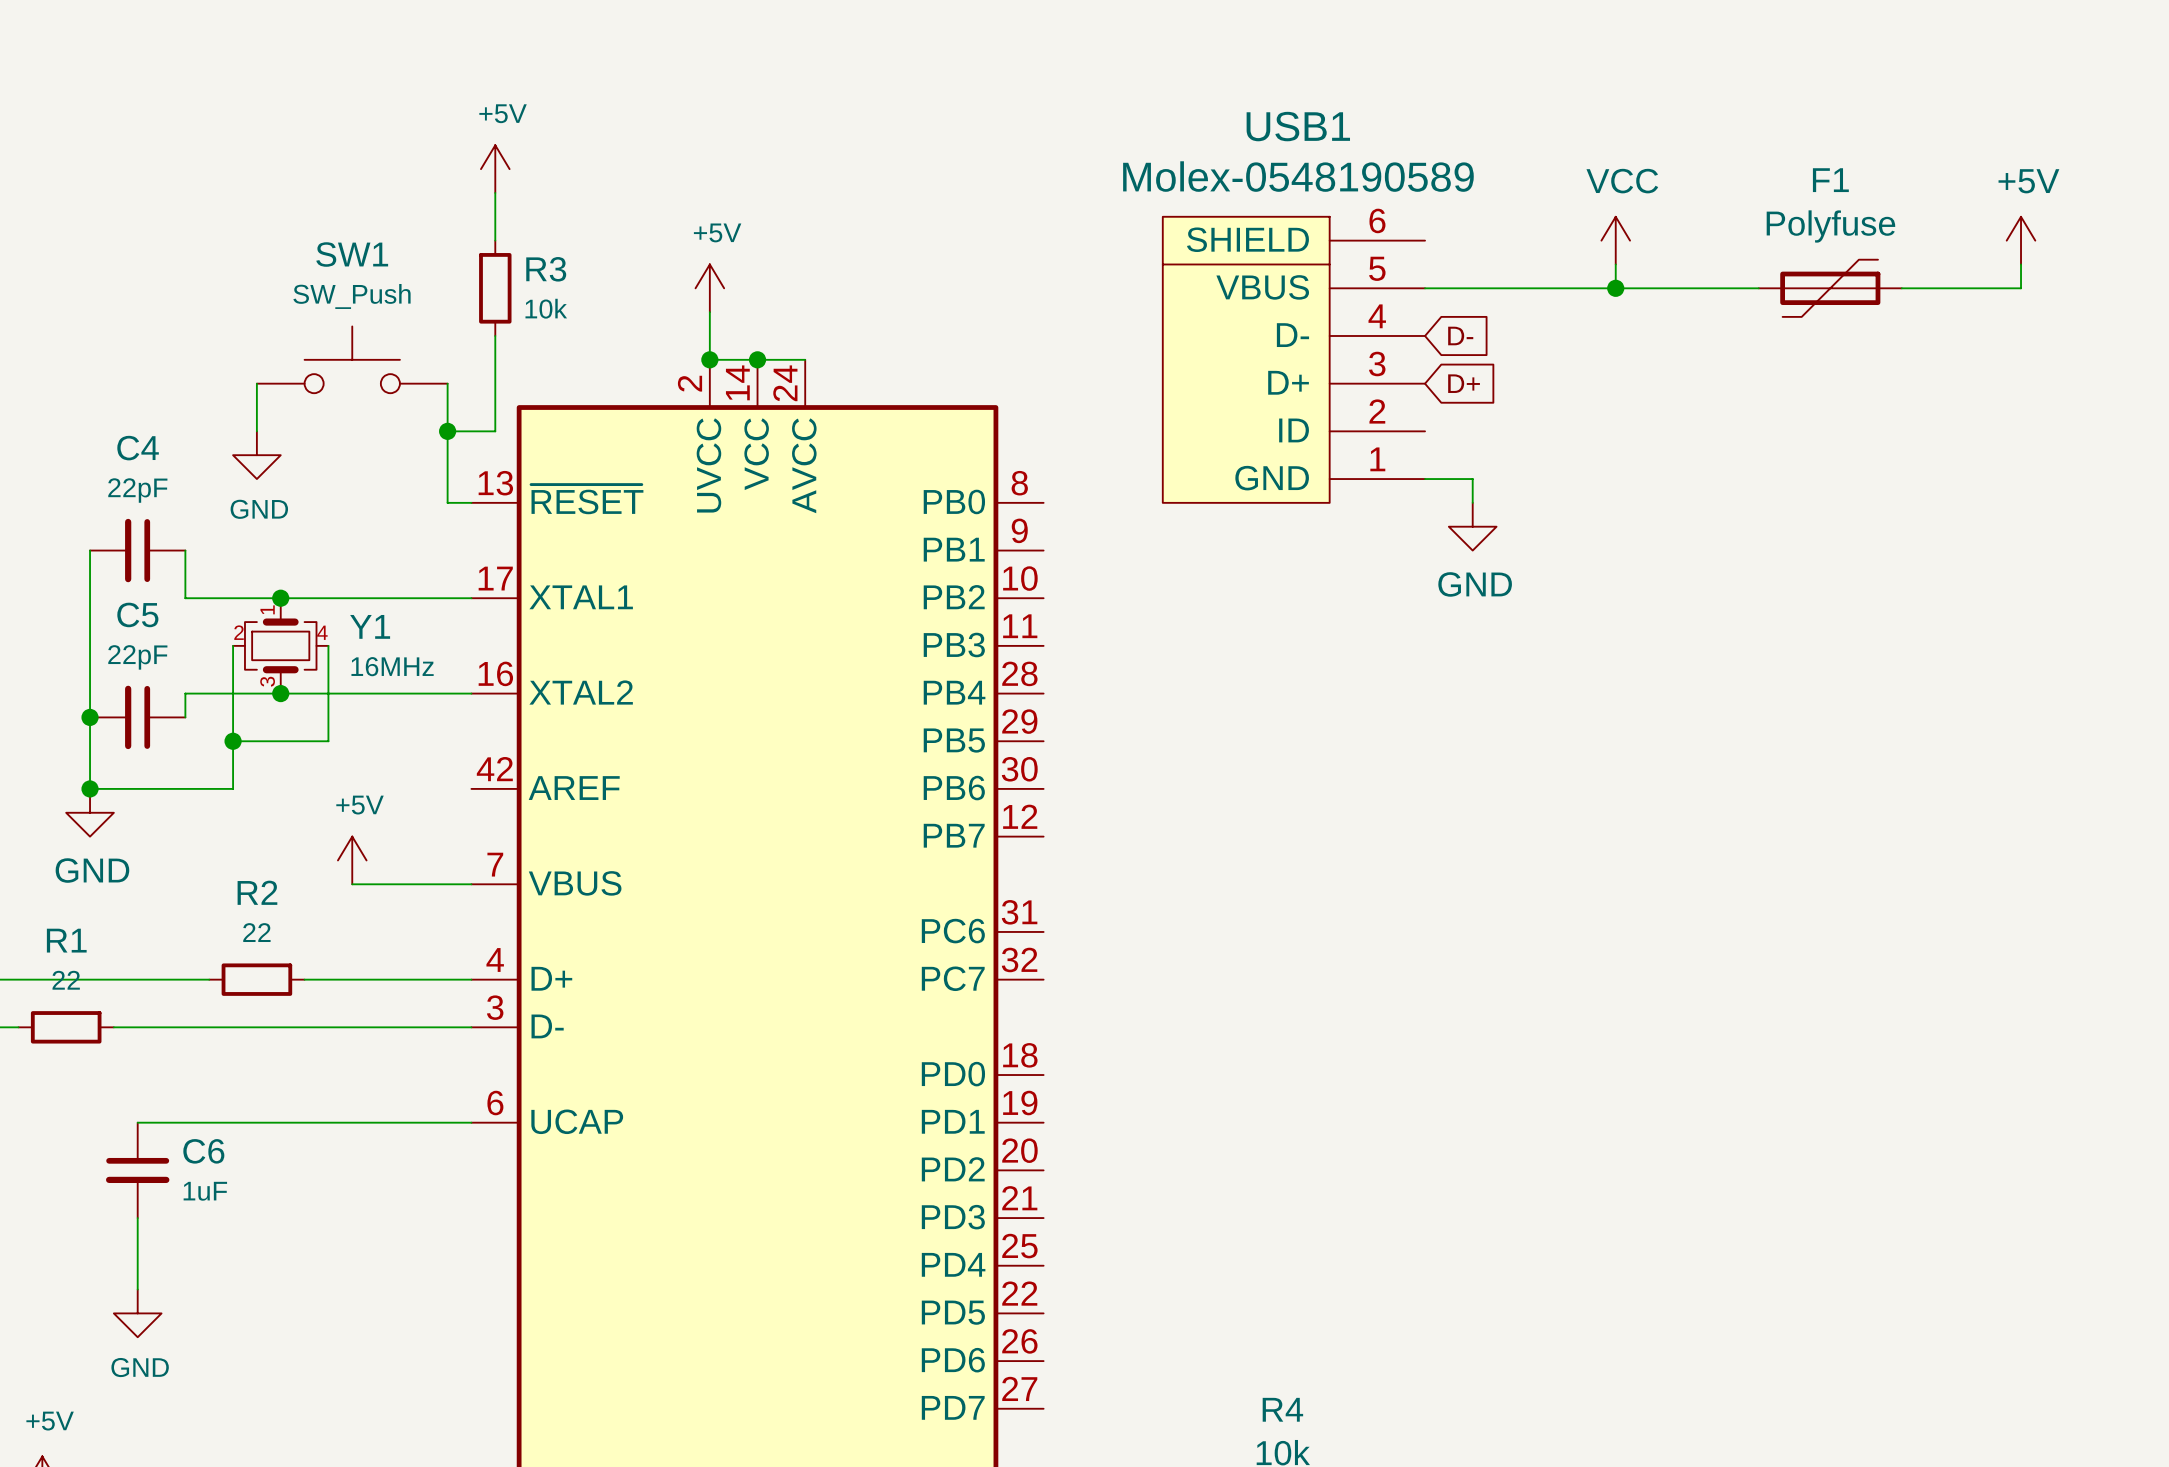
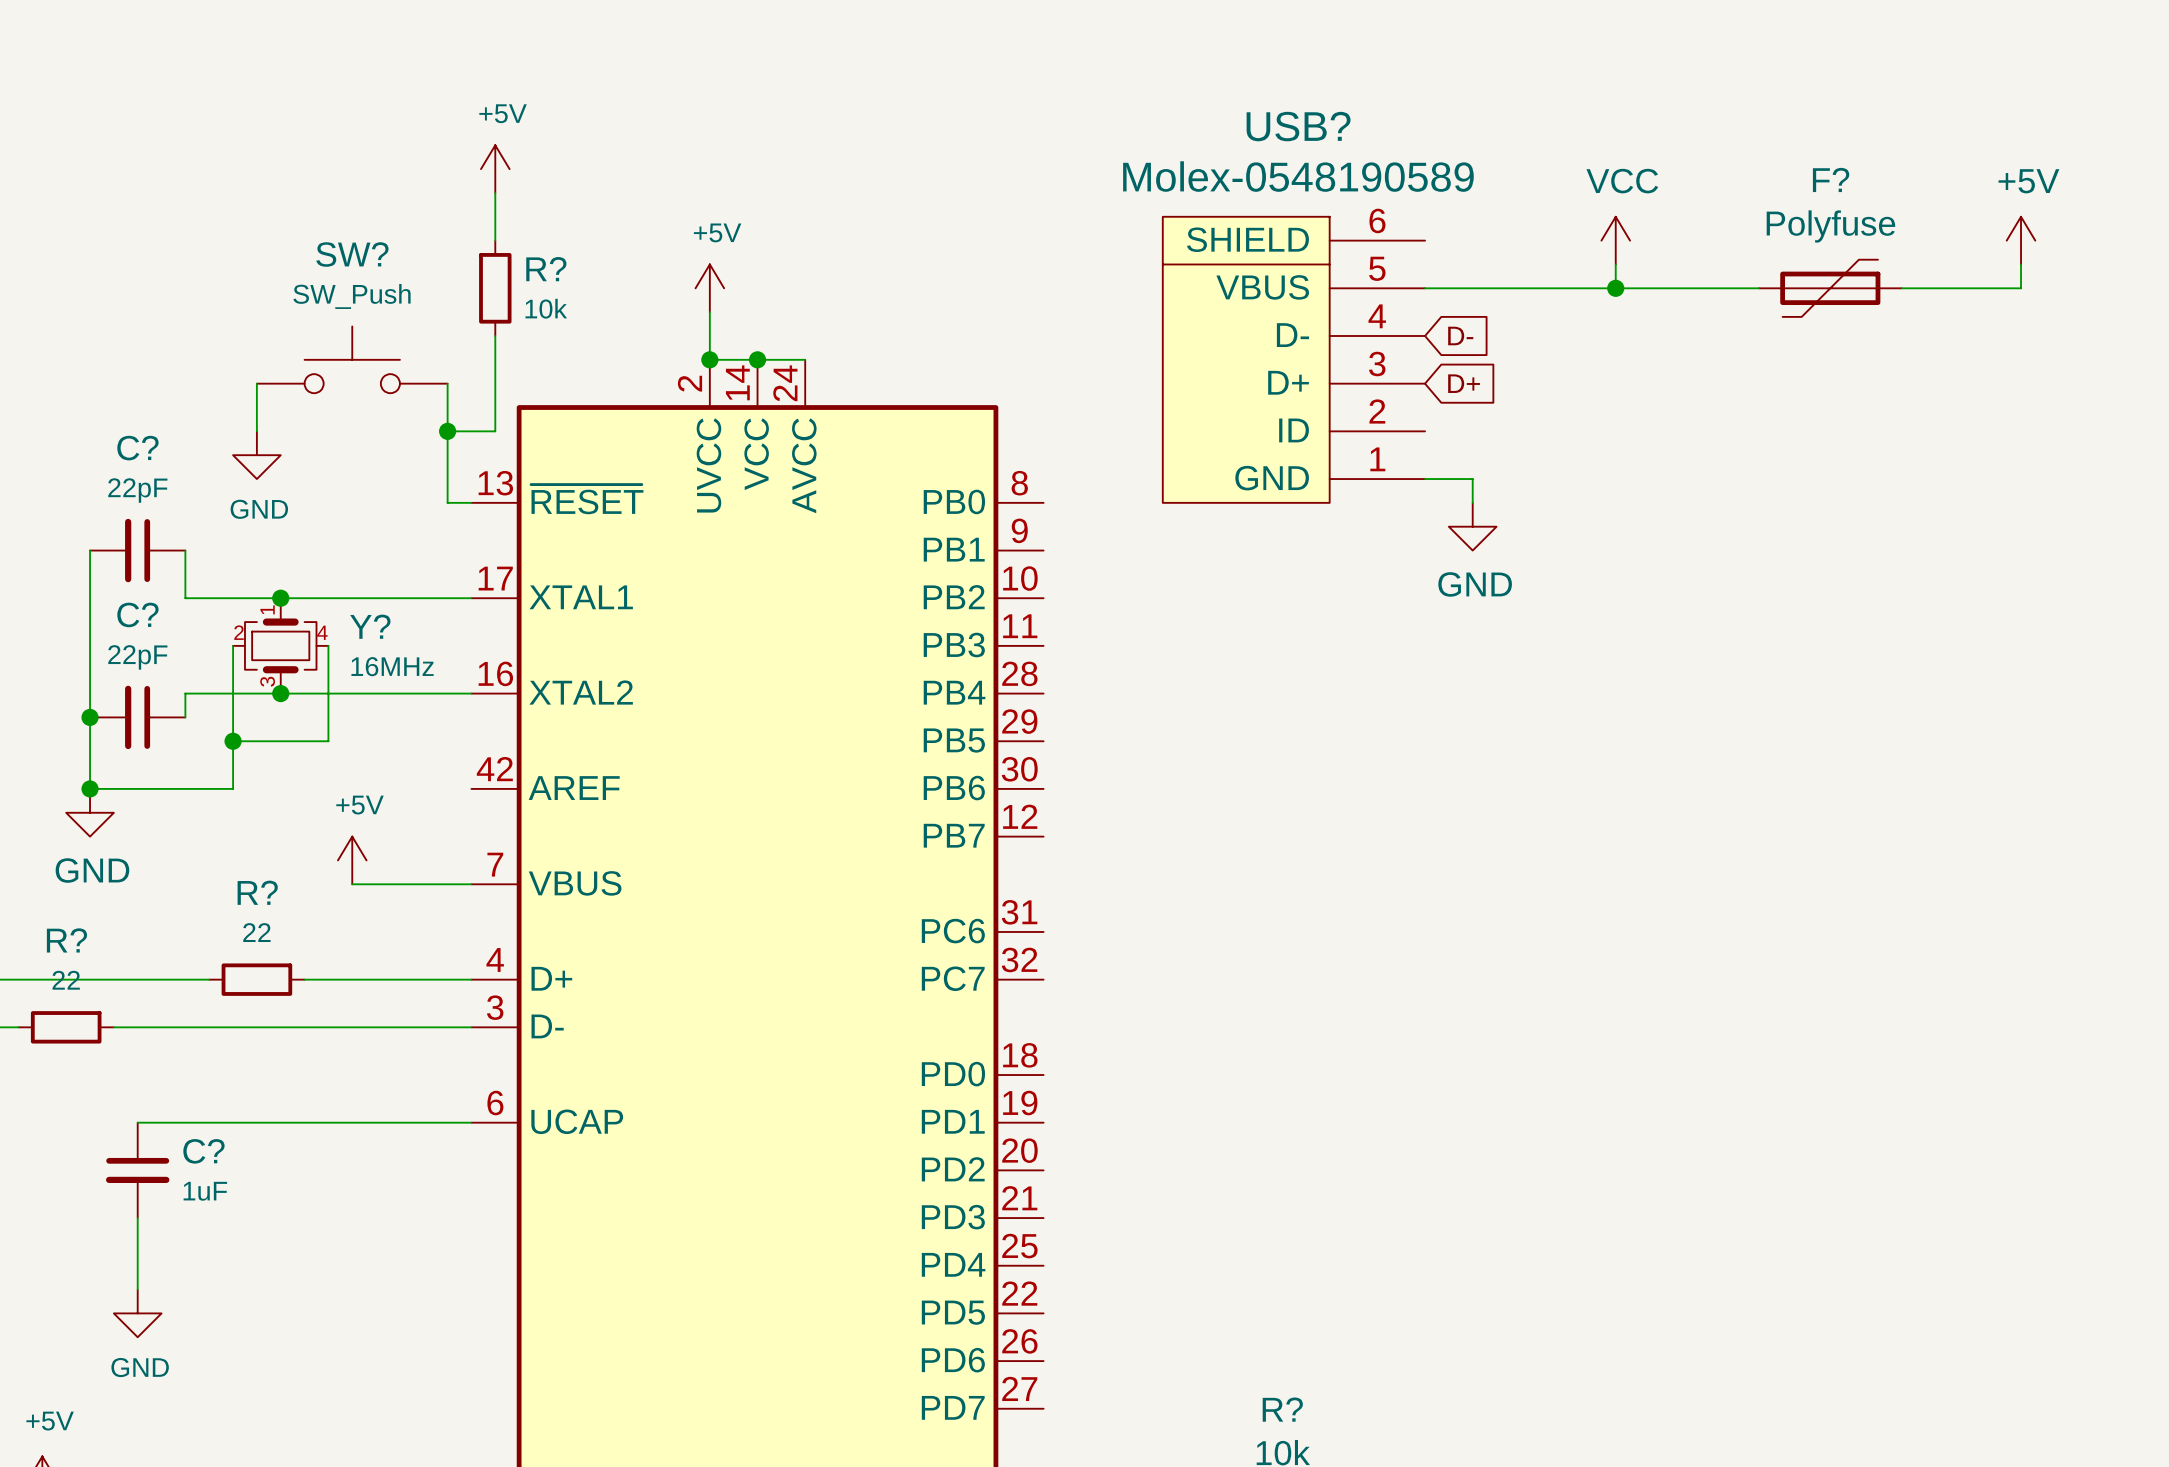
USB1 name: USB1 (1298, 126) -> USB? (1298, 126)
F1 name: F1 (1830, 180) -> F? (1831, 179)
SW1 name: SW1 (352, 254) -> SW? (352, 254)
R3 name: R3 (546, 269) -> R? (546, 269)
C4 name: C4 (138, 448) -> C? (137, 448)
C5 name: C5 (137, 614) -> C? (137, 614)
Y1 name: Y1 (370, 626) -> Y? (370, 626)
R2 name: R2 (257, 892) -> R? (257, 892)
R1 name: R1 (66, 940) -> R? (66, 940)
C6 name: C6 (203, 1151) -> C? (203, 1151)
R4 name: R4 (1282, 1409) -> R? (1282, 1409)

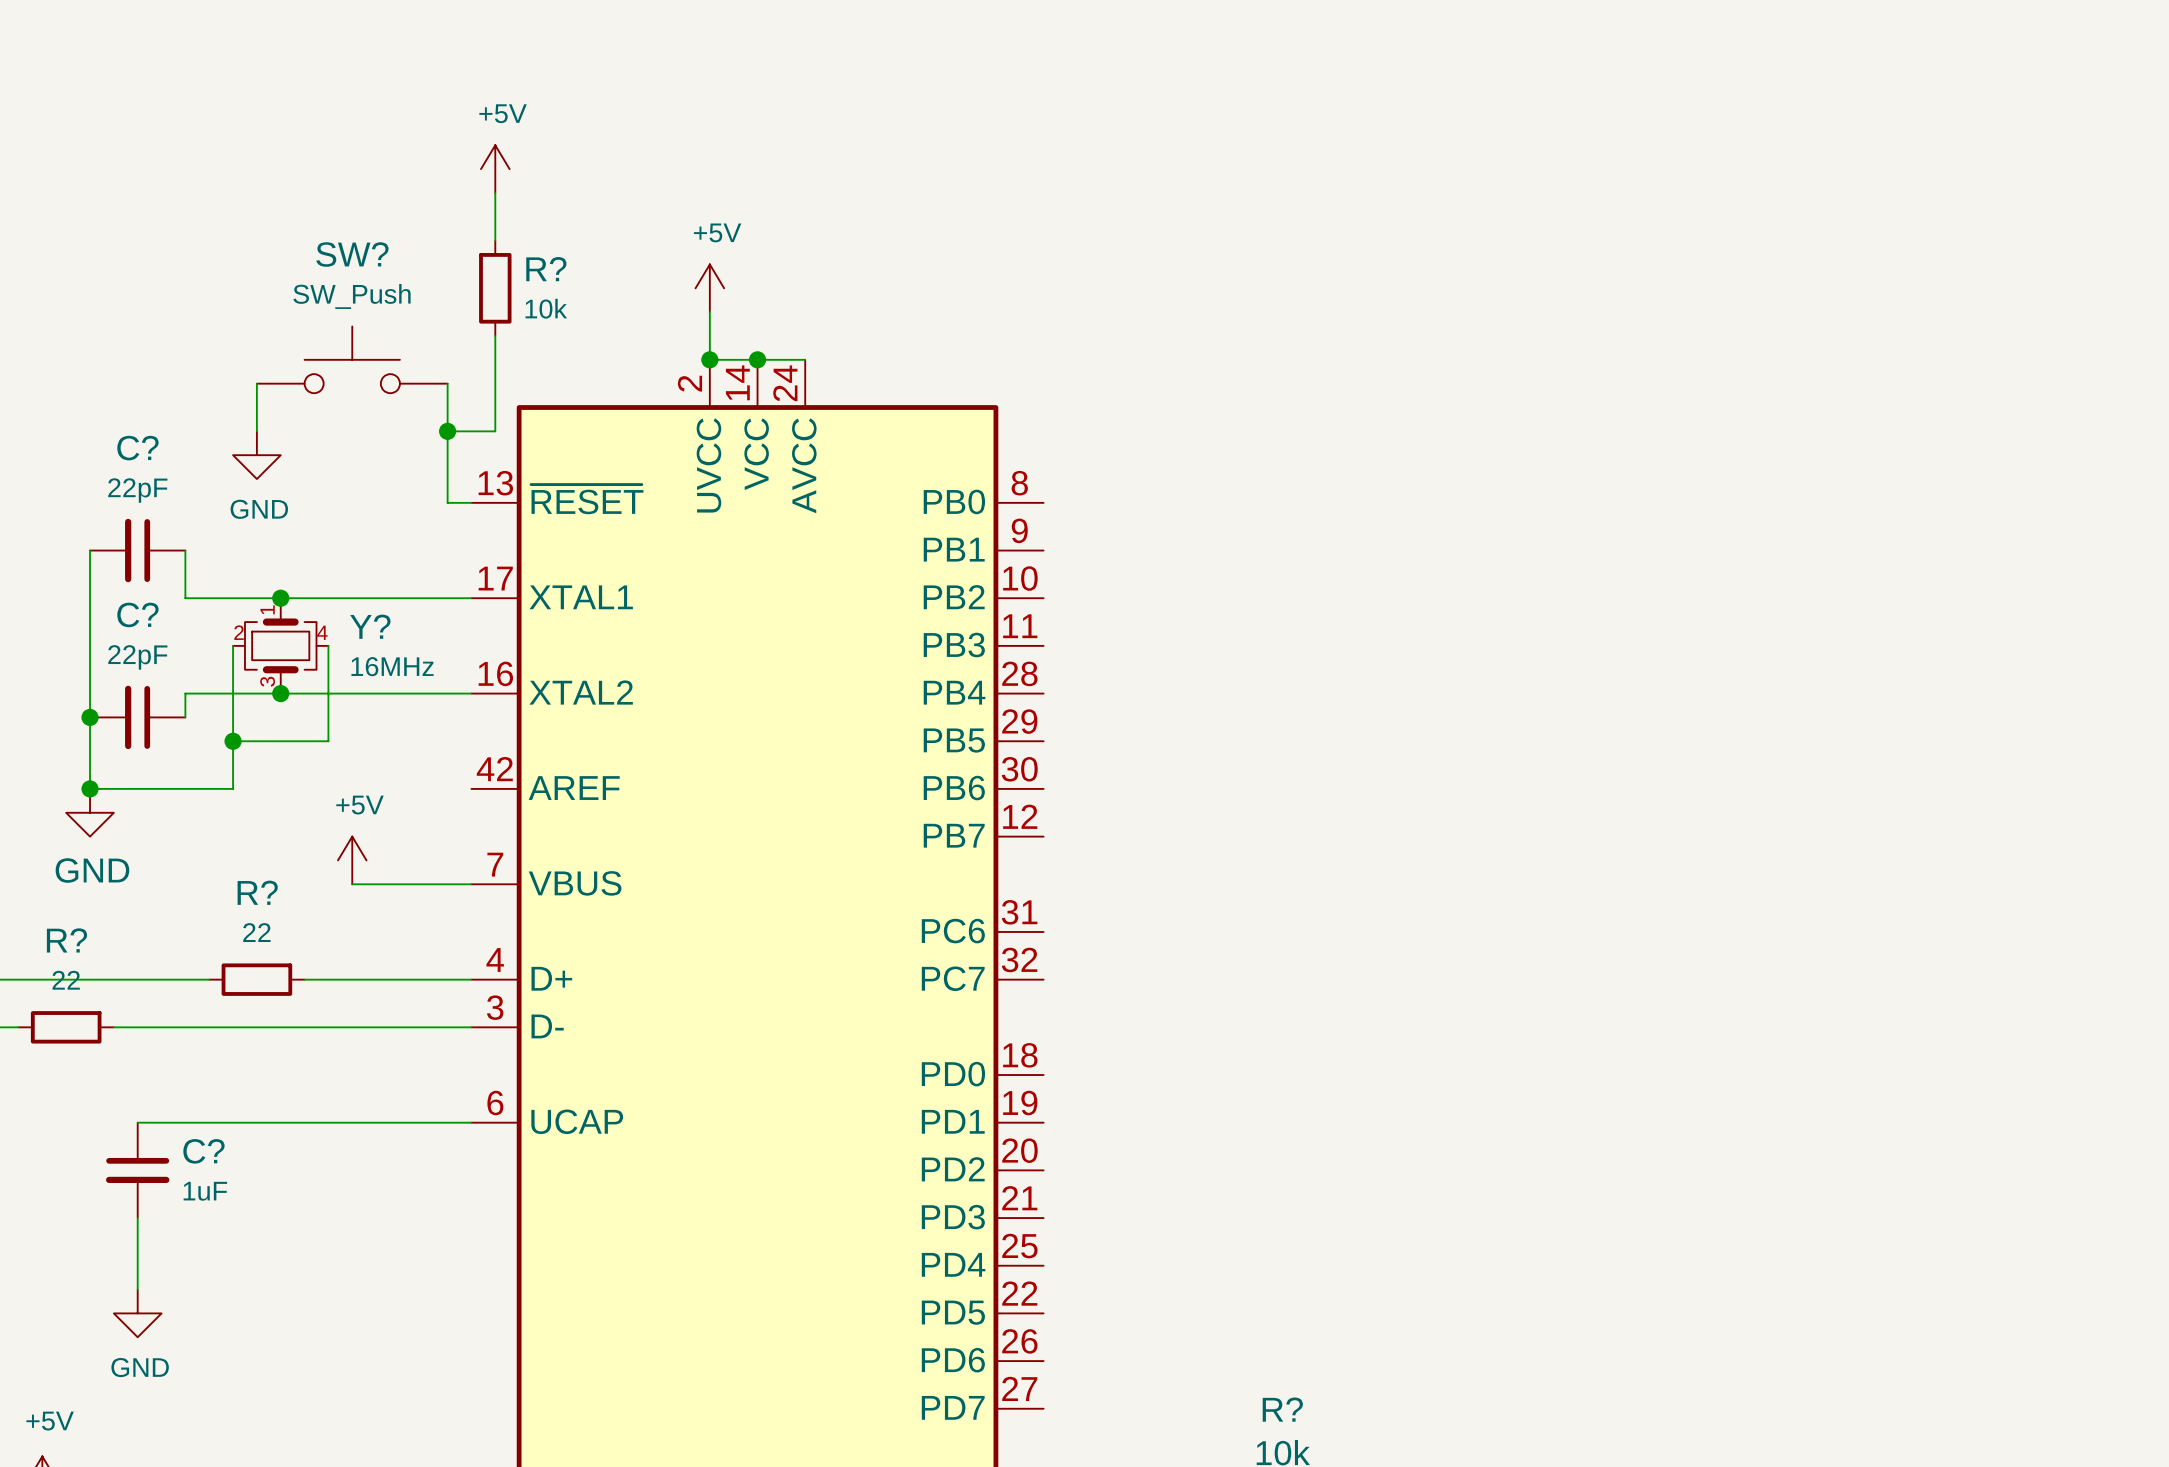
power symbol: VCC (1615, 240) -> none
power symbol: +5V (2021, 240) -> none
wire: (1615, 264) (1615, 288) -> none
wire: (2021, 264) (2021, 288) (1901, 288) -> none
wire: (1425, 288) (1758, 288) -> none
junction: (1615, 288) -> none
F?: Polyfuse (1830, 288) -> none
global label: D- (1460, 335) -> none
USB?: Molex-0548190589 (1293, 359) -> none
global label: D+ (1464, 383) -> none
wire: (1425, 479) (1472, 479) (1472, 502) -> none
power symbol: GND (1472, 526) -> none

